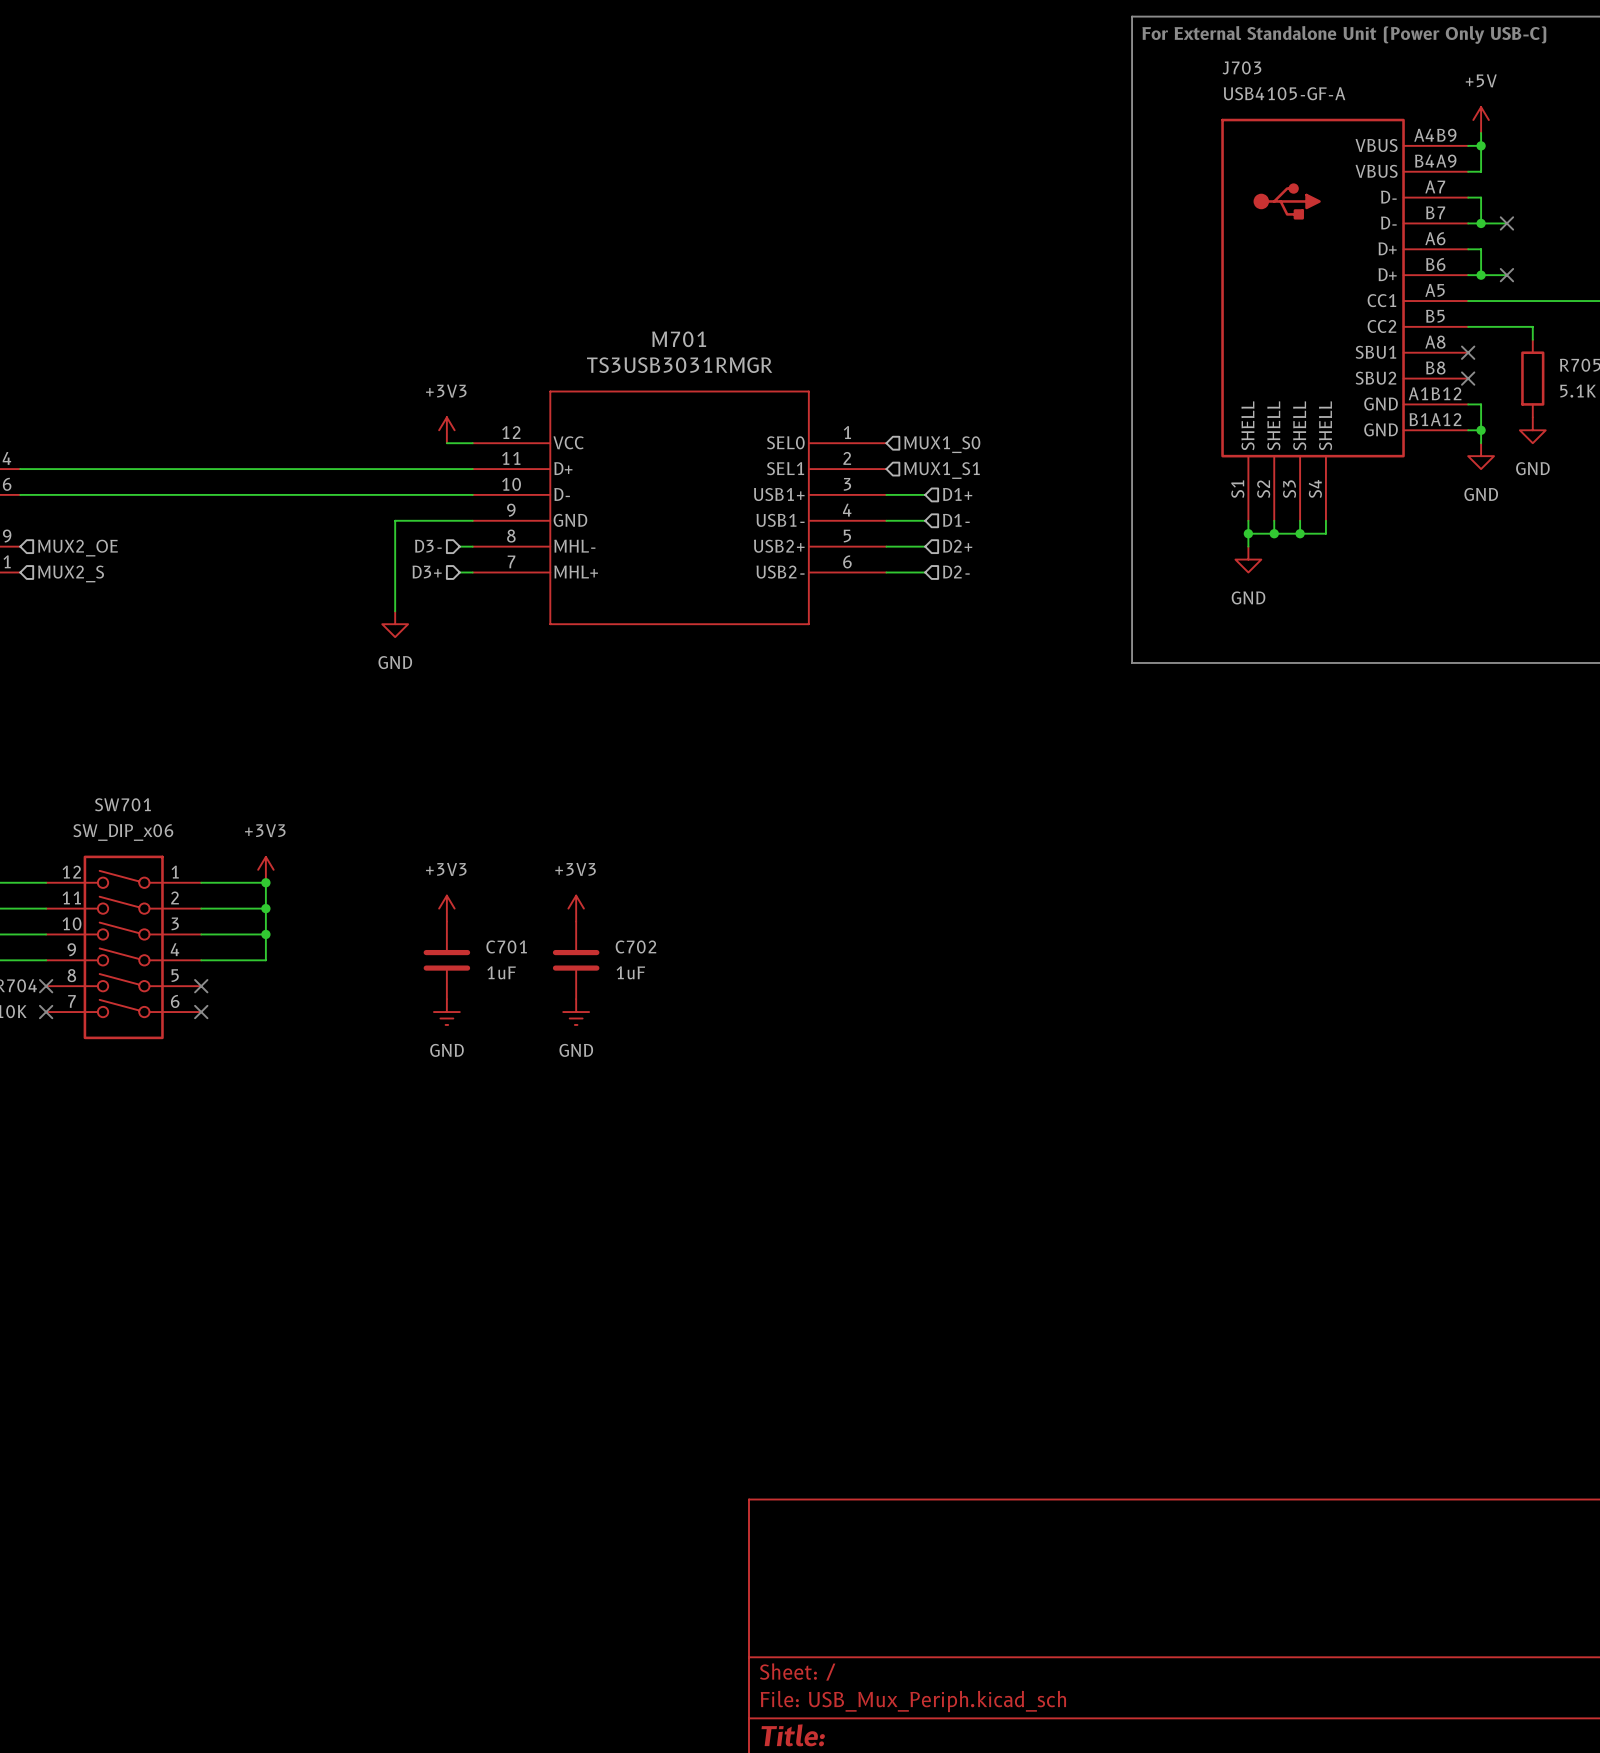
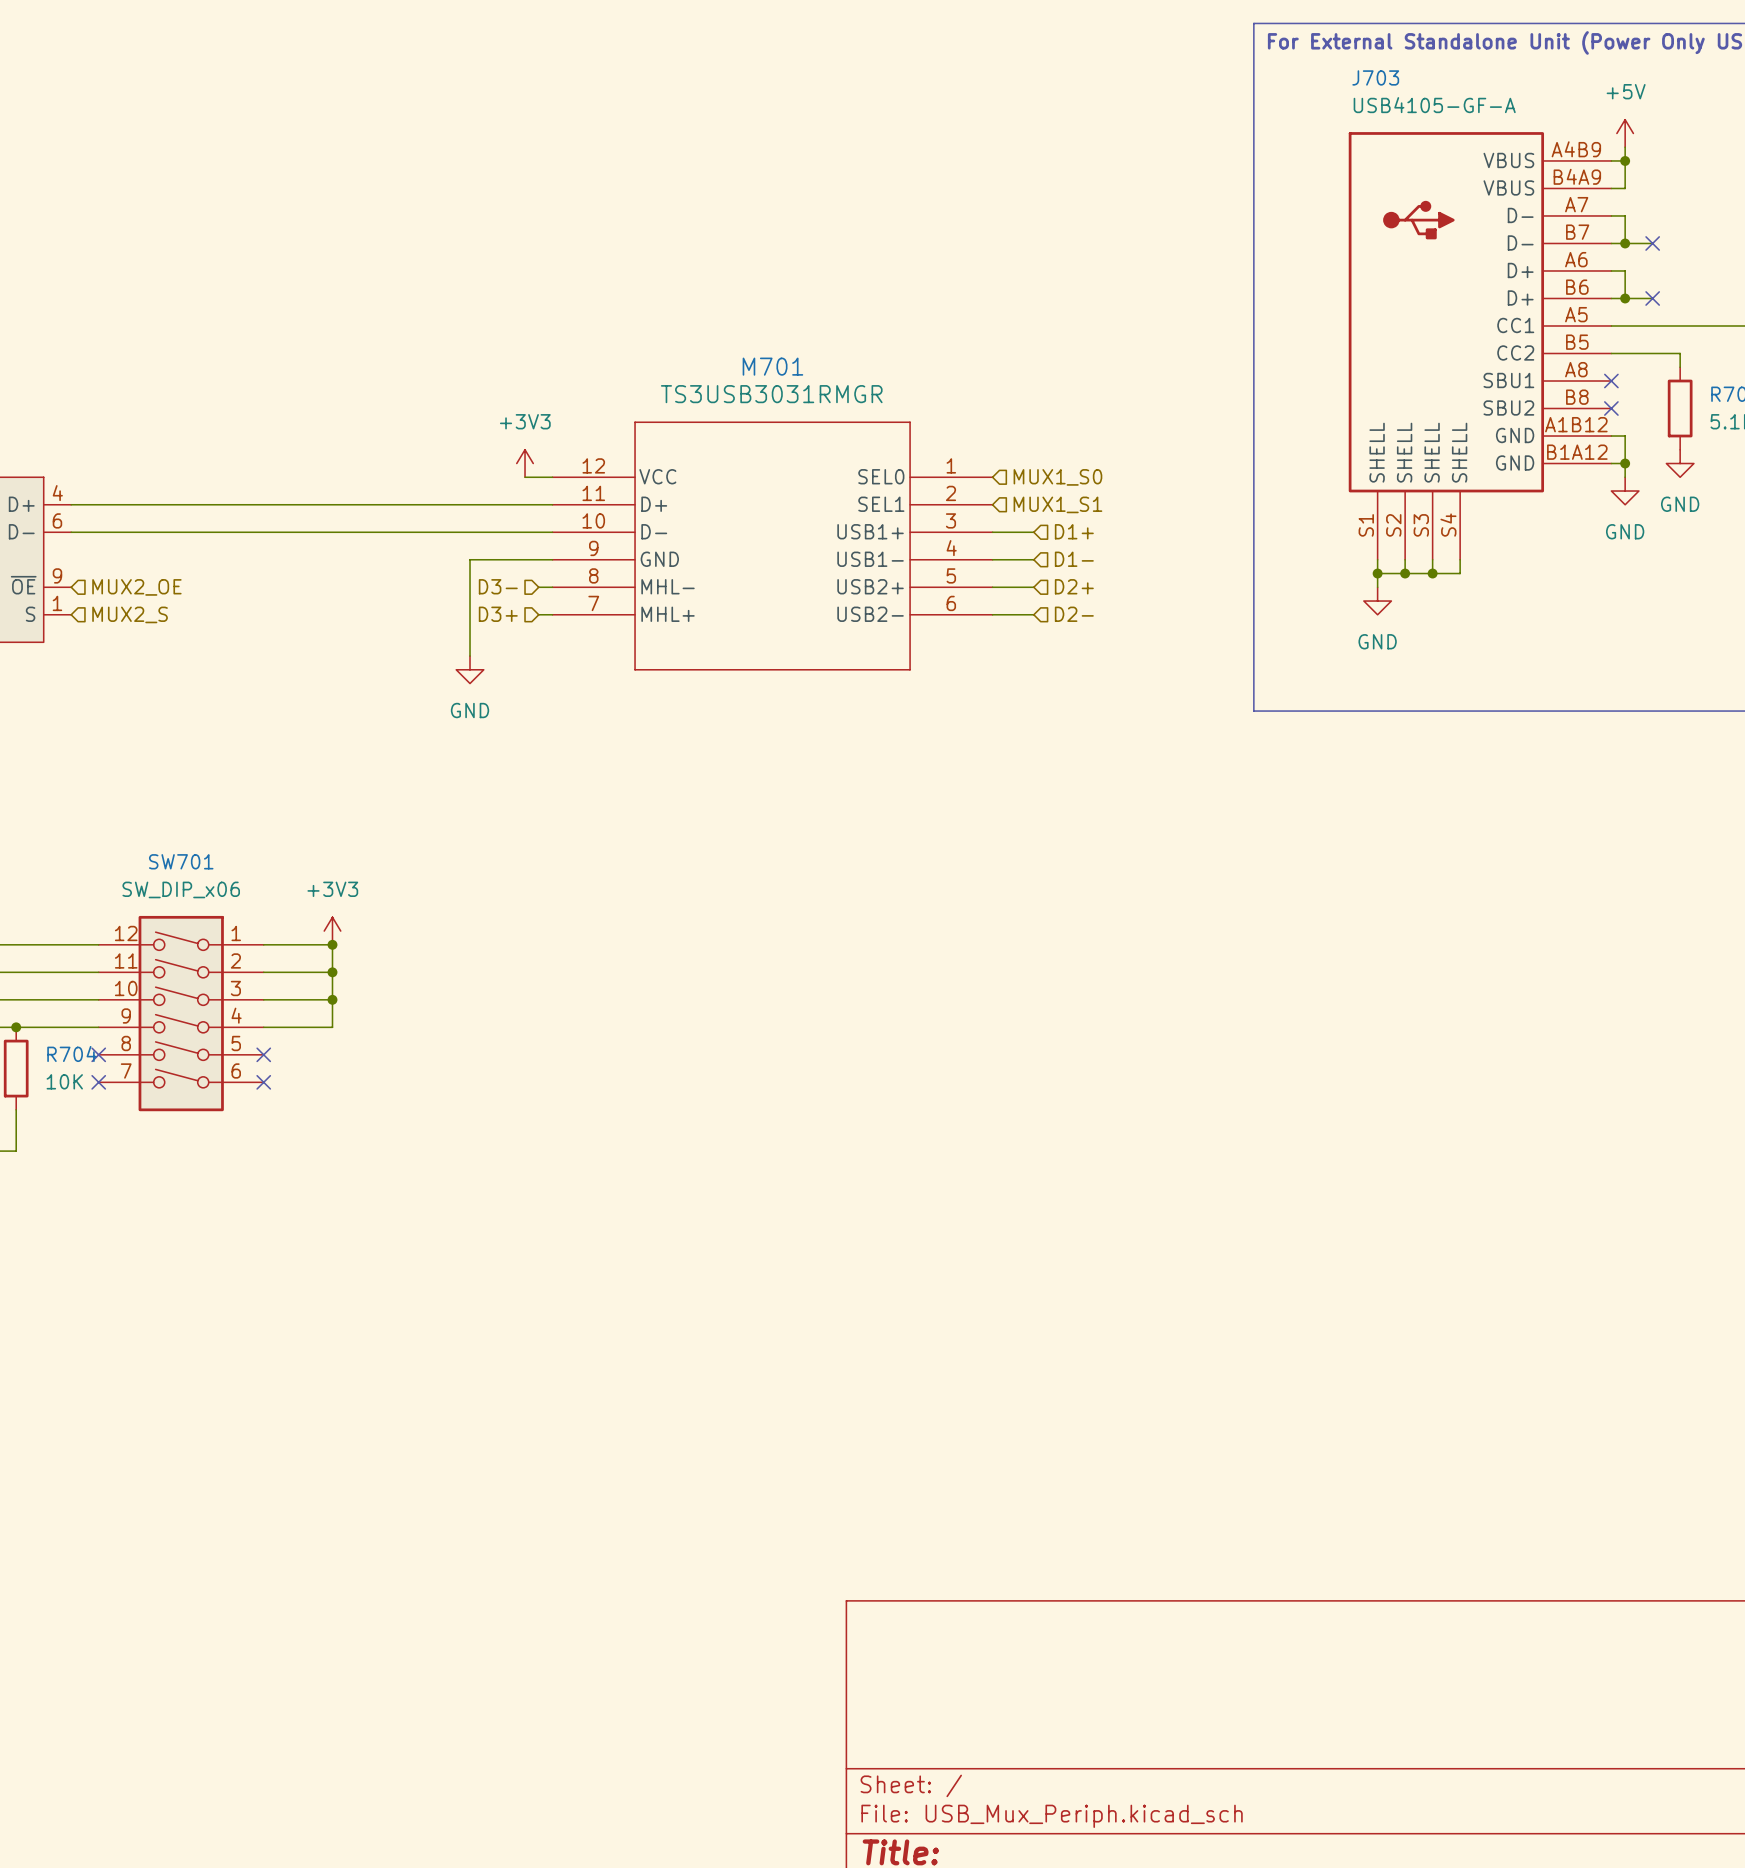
power symbol: +3V3 (446, 908) -> none
power symbol: +3V3 (576, 908) -> none
C701: 1uF (446, 960) -> none
C702: 1uF (576, 960) -> none
power symbol: GND (446, 1012) -> none
power symbol: GND (576, 1012) -> none

